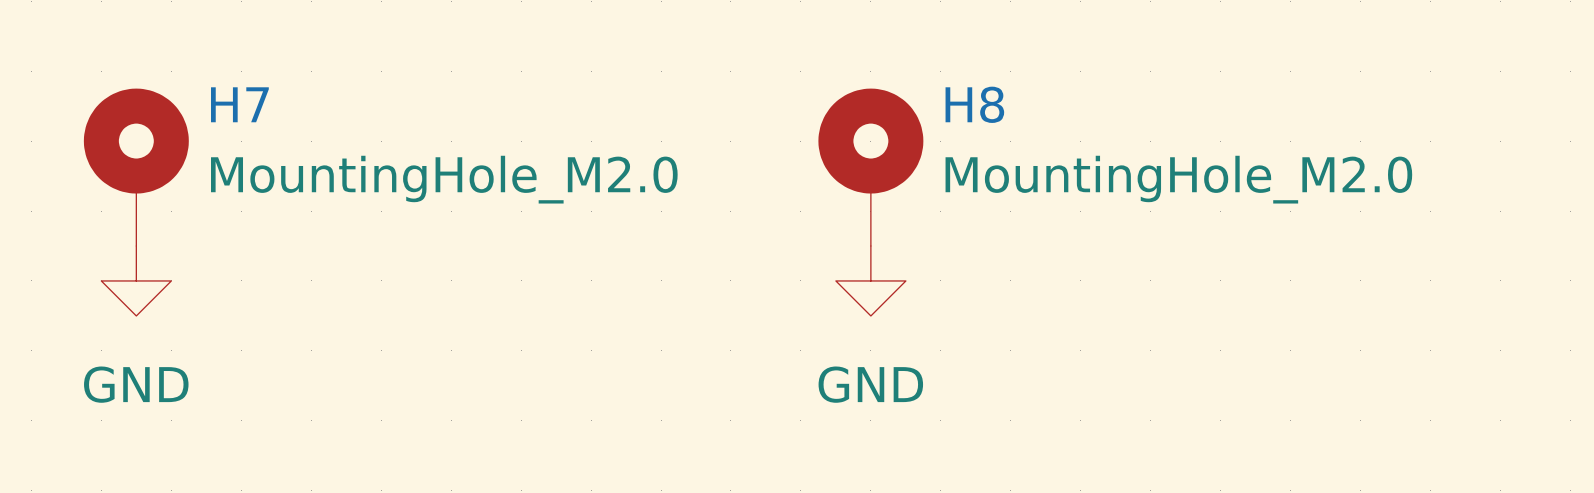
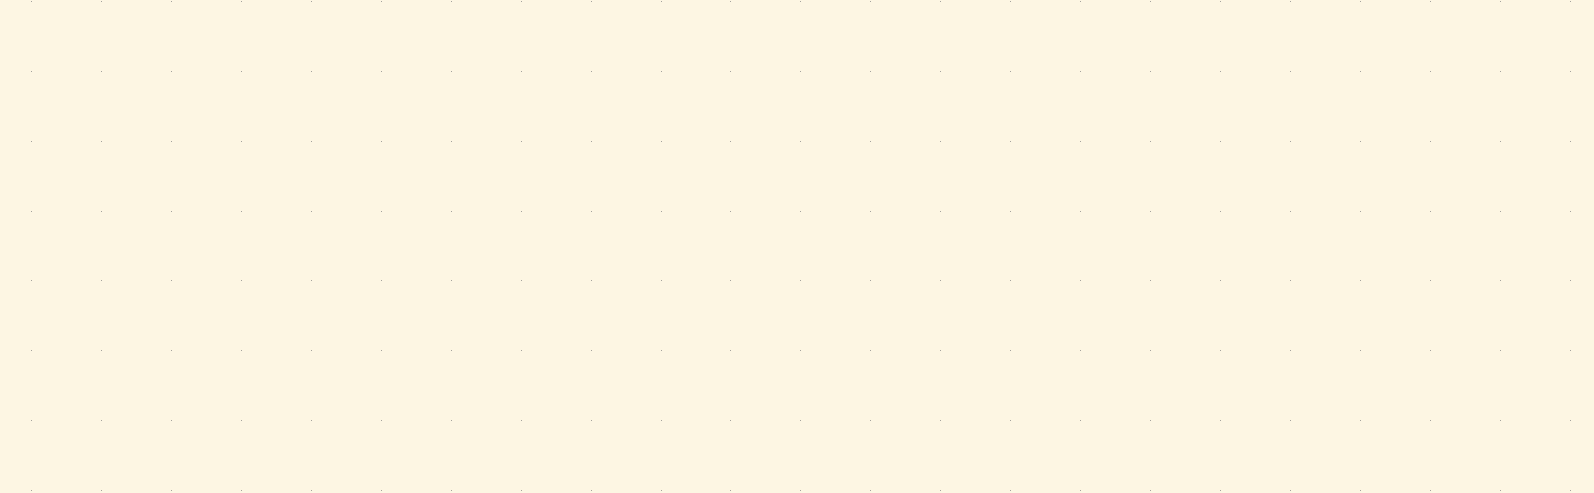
H7: MountingHole_M2.0 (136, 167) -> none
H8: MountingHole_M2.0 (870, 167) -> none
power symbol: GND (136, 280) -> none
power symbol: GND (870, 280) -> none

